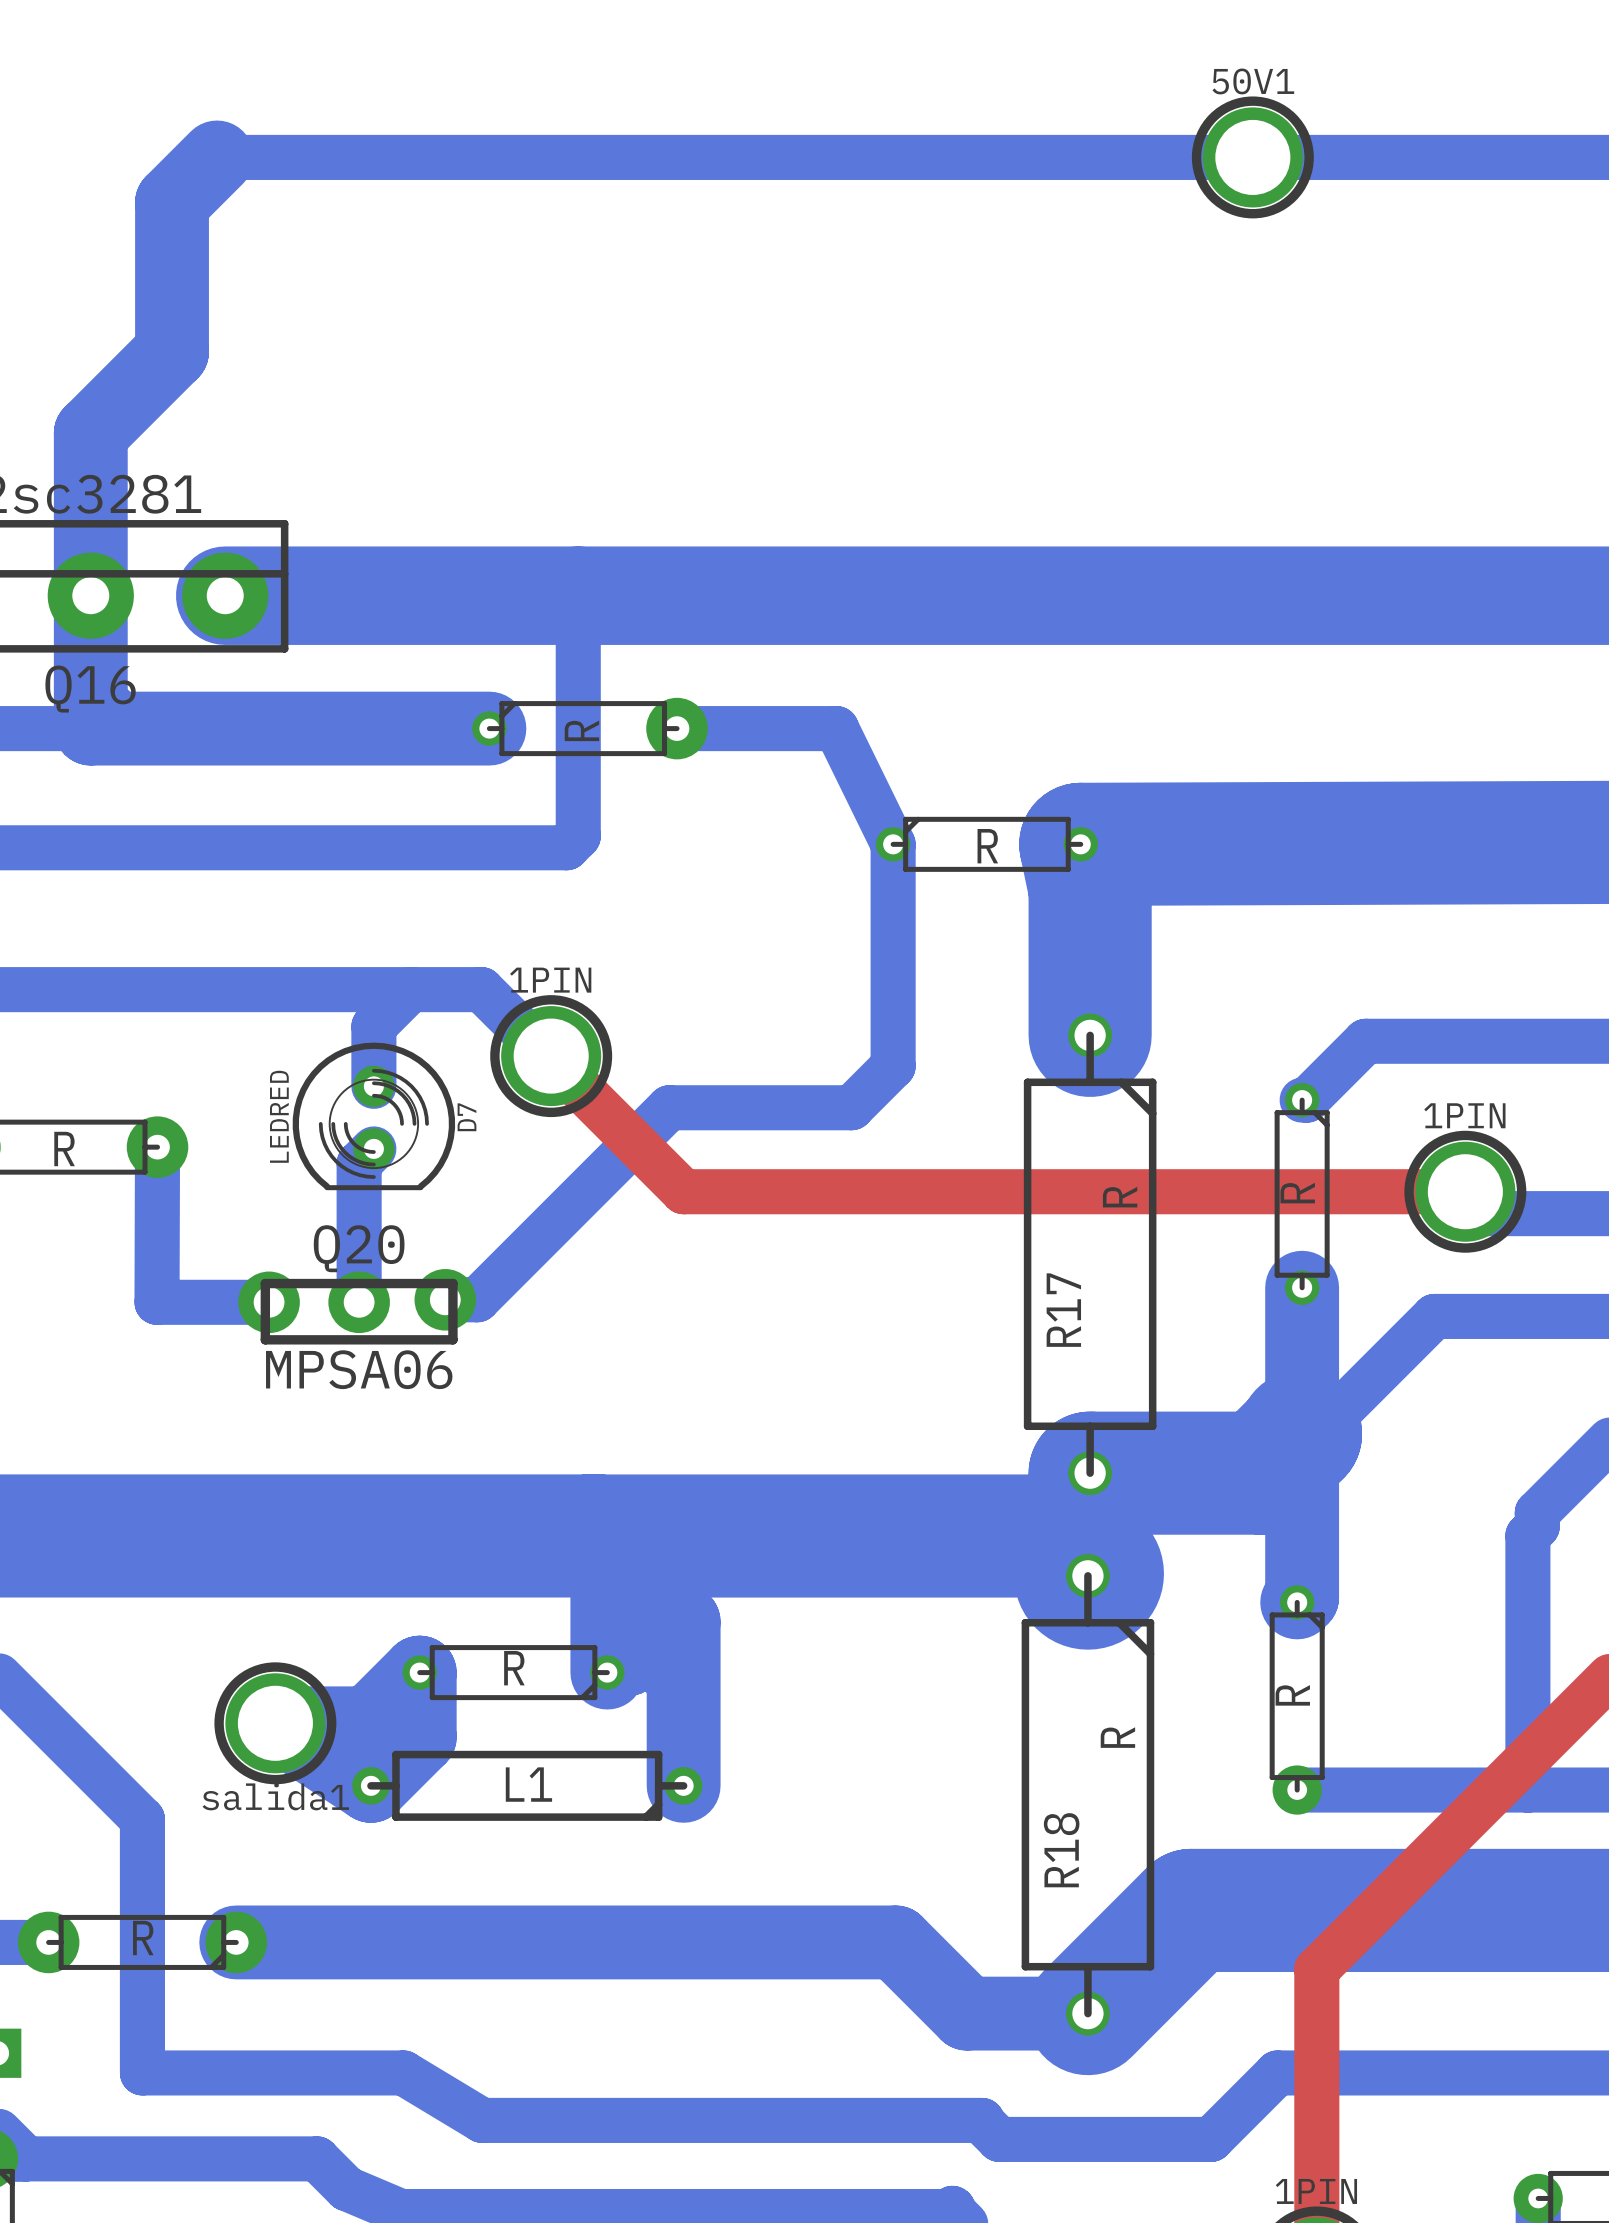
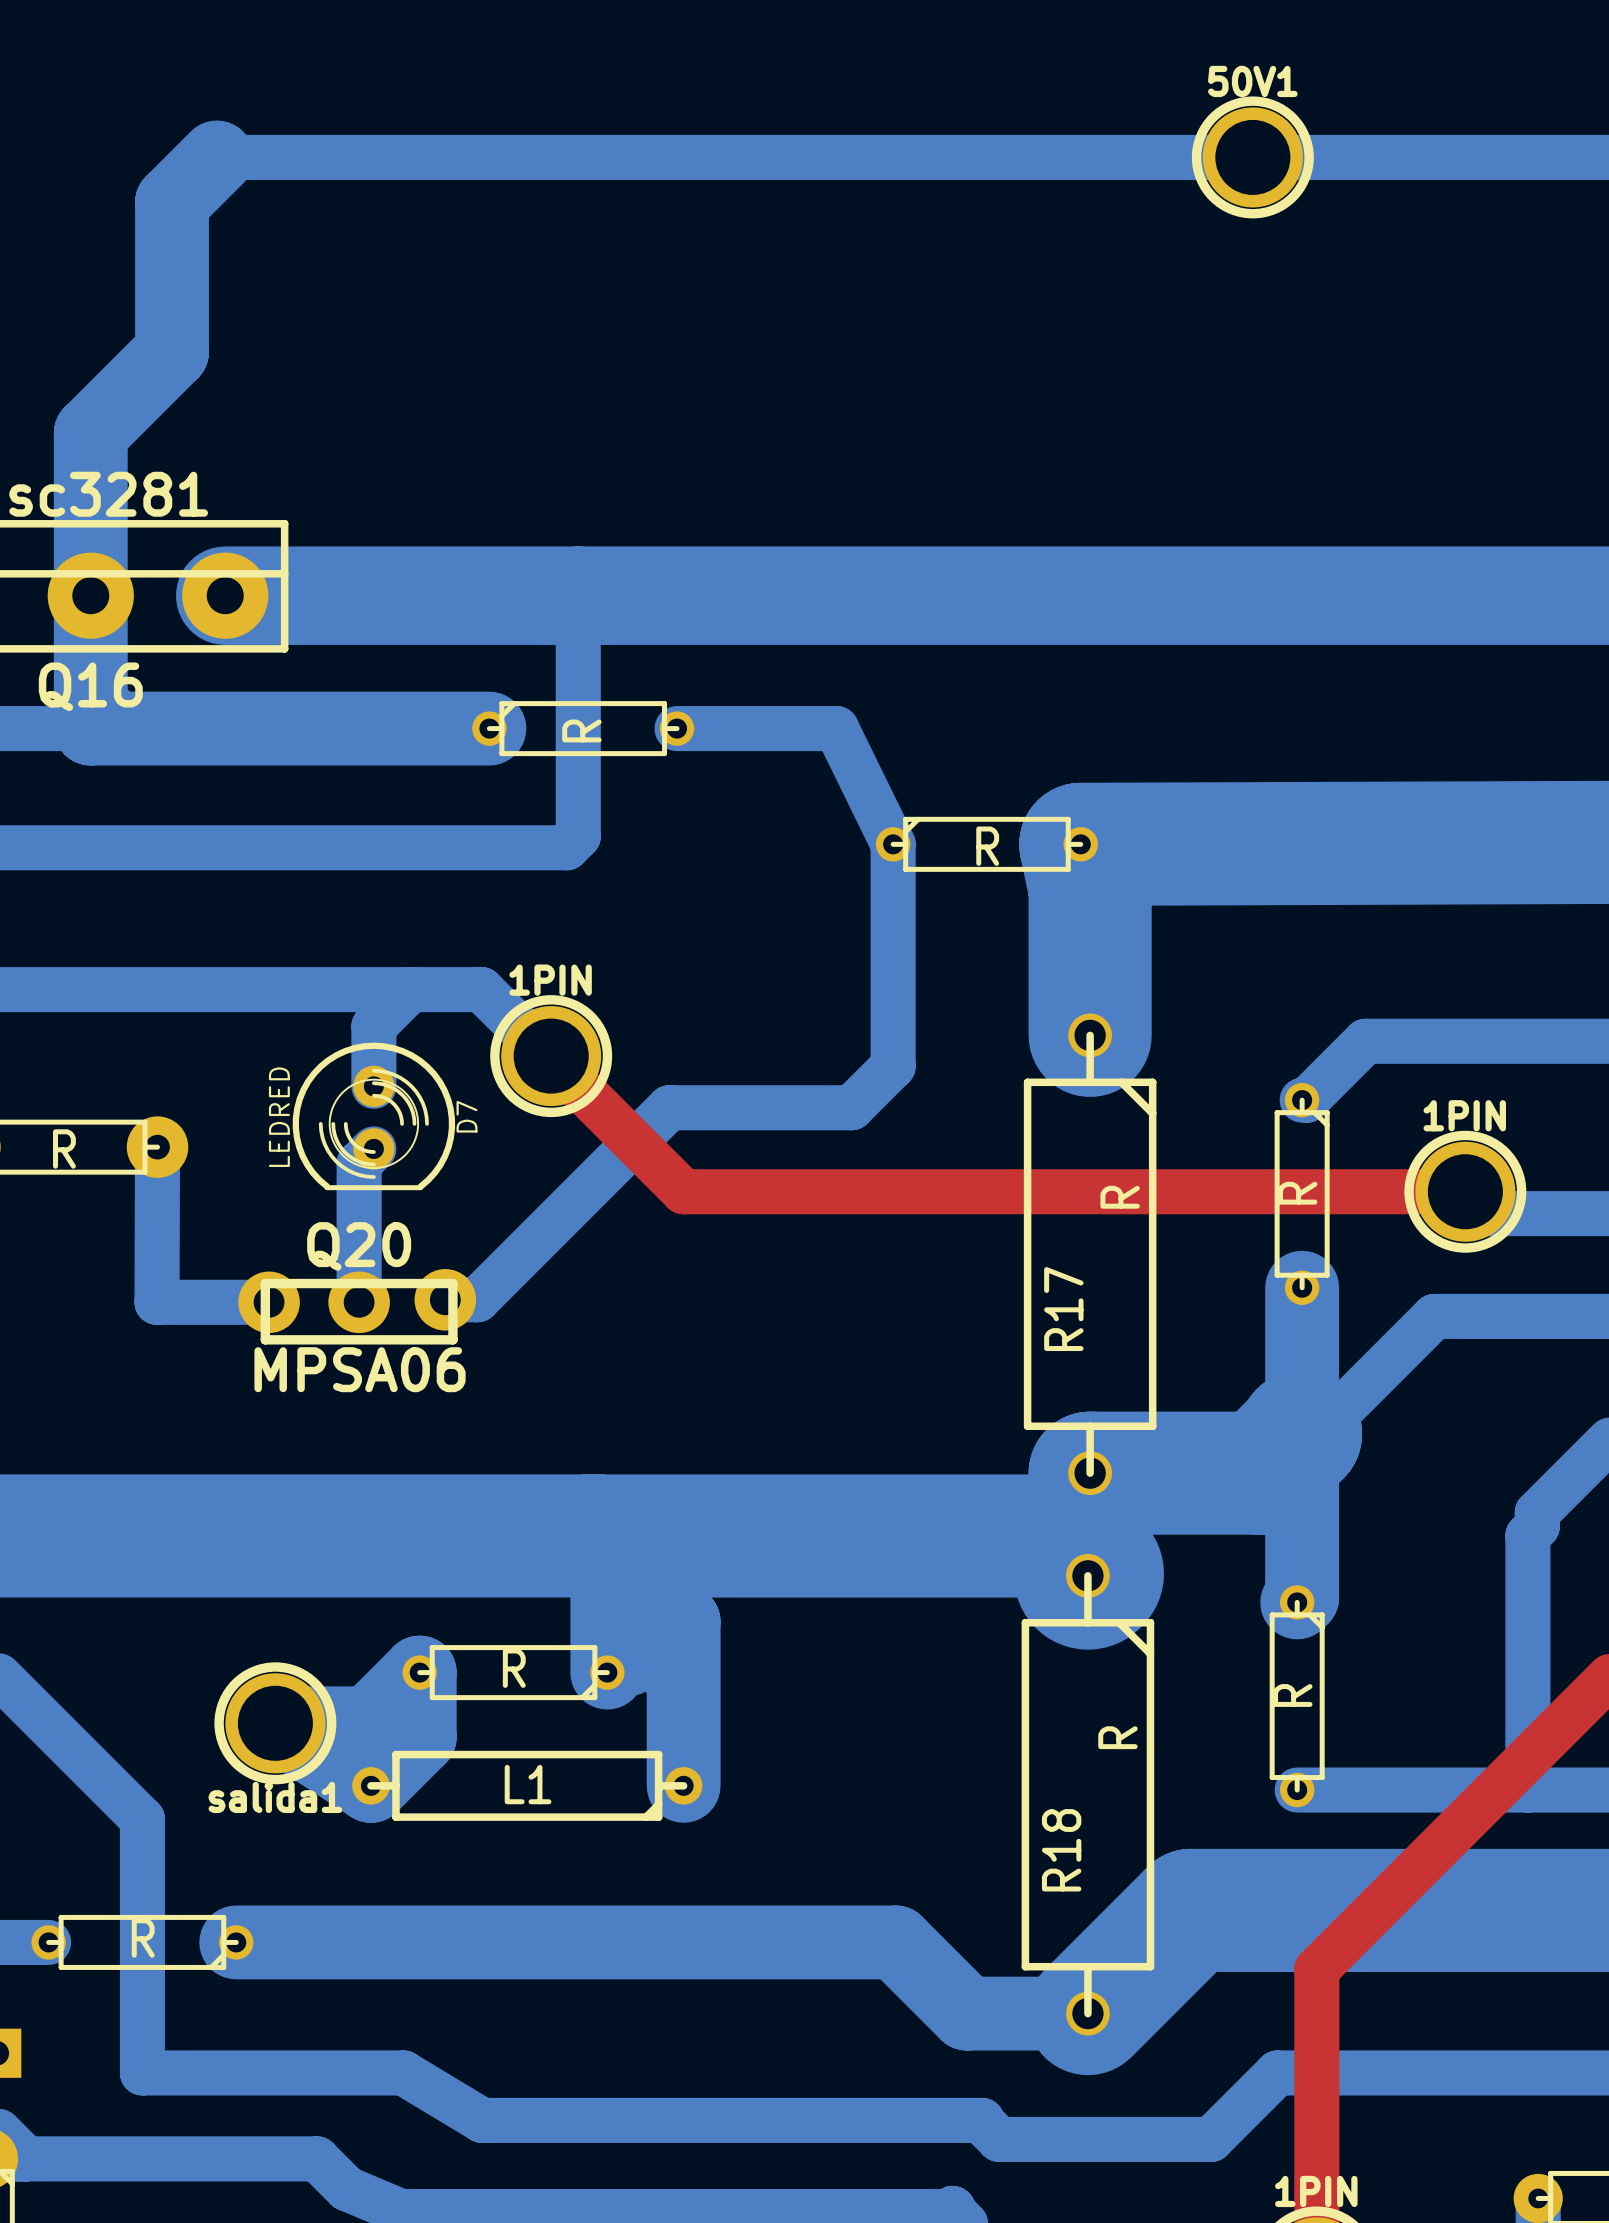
part footprint: [472, 697, 708, 760] -> [472, 701, 695, 757]
part footprint: [1269, 1585, 1325, 1815] -> [1269, 1585, 1325, 1808]
part footprint: [17, 1911, 268, 1974] -> [31, 1914, 254, 1970]

